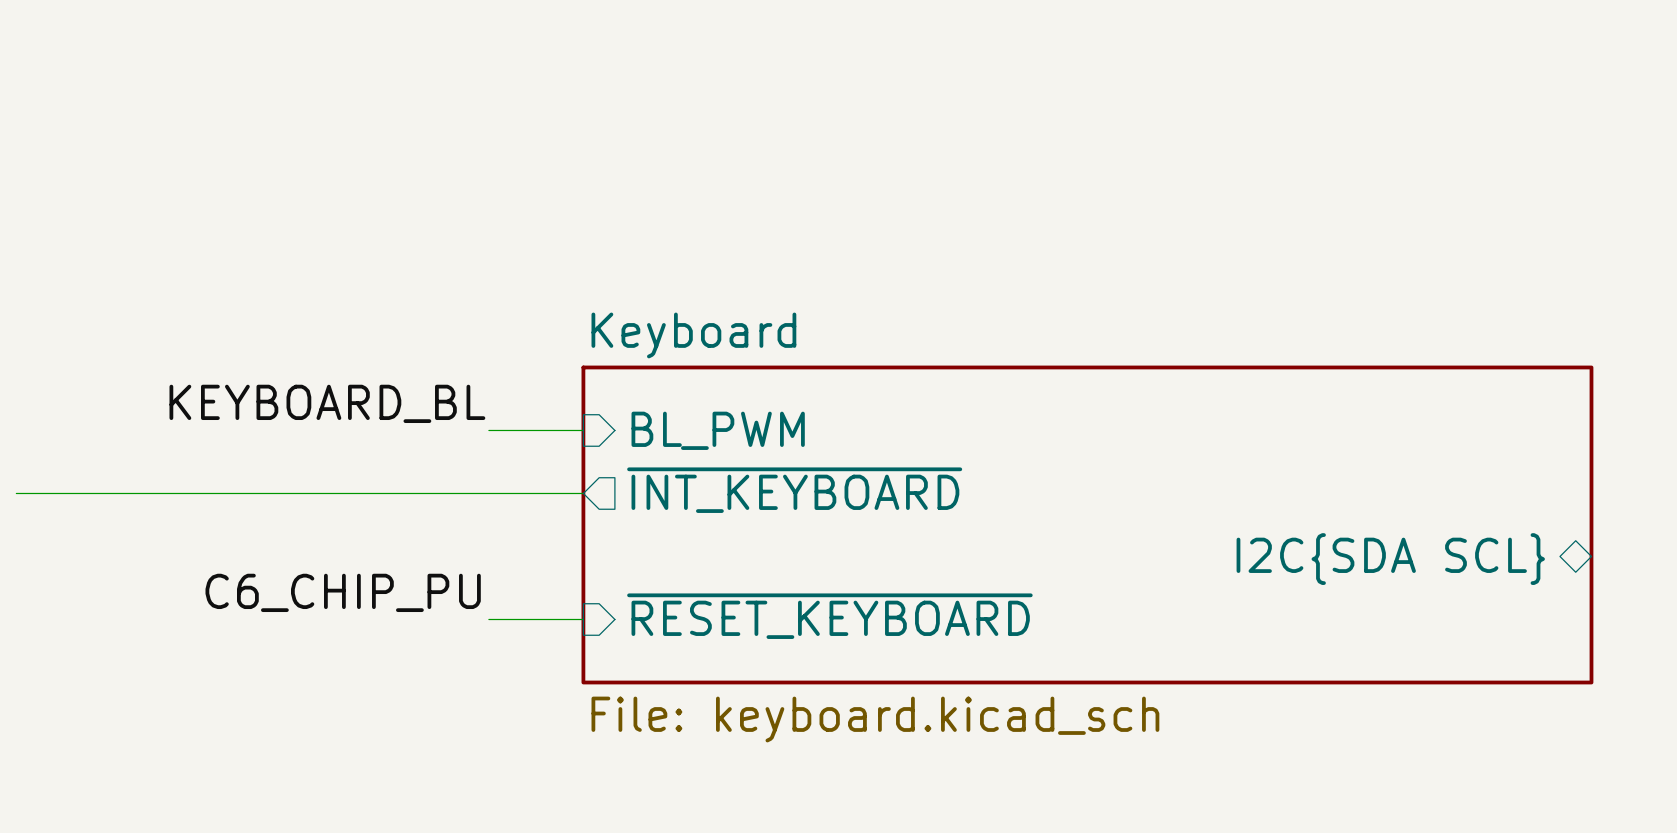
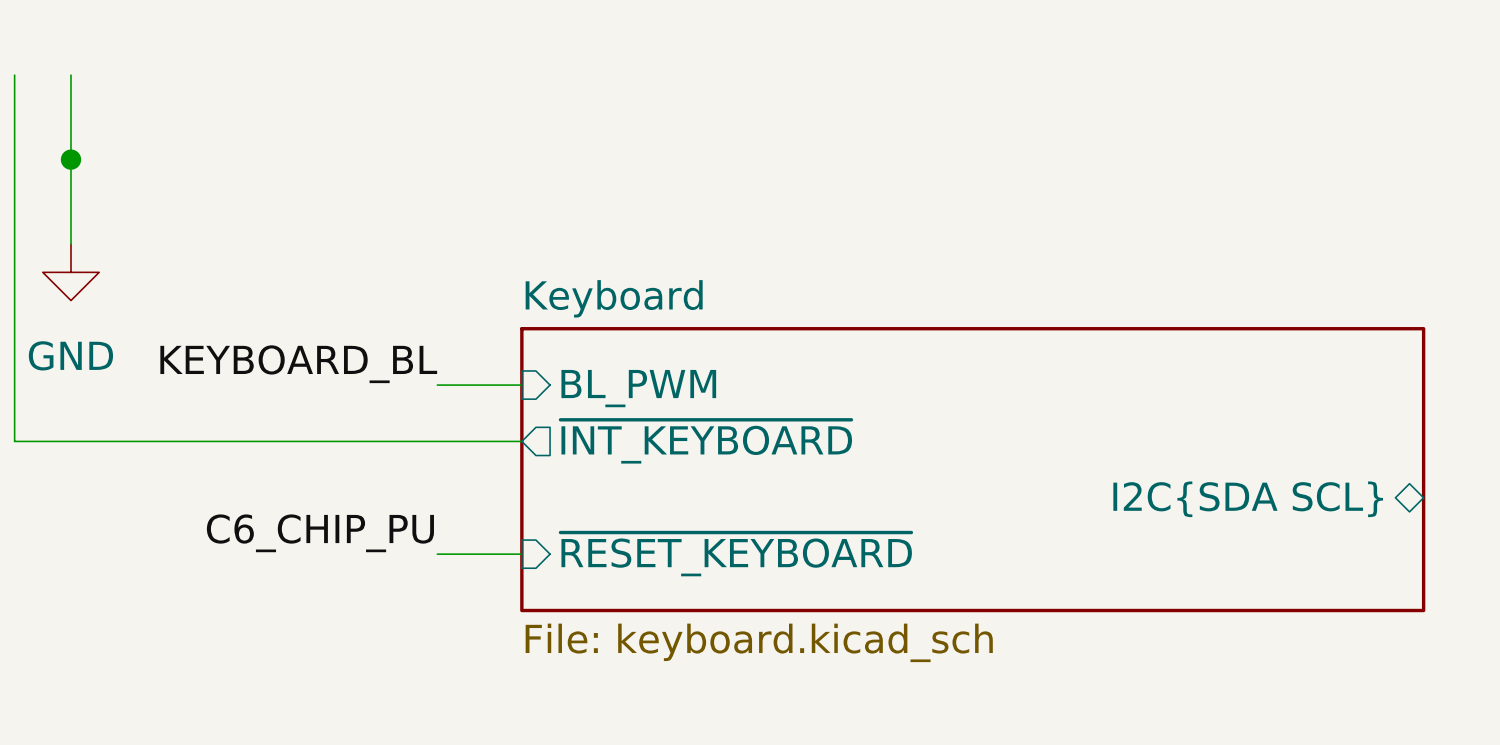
wire: none -> (14, 75) (14, 441)
wire: none -> (70, 75) (70, 244)
junction: none -> (70, 159)
power symbol: none -> GND (70, 272)

